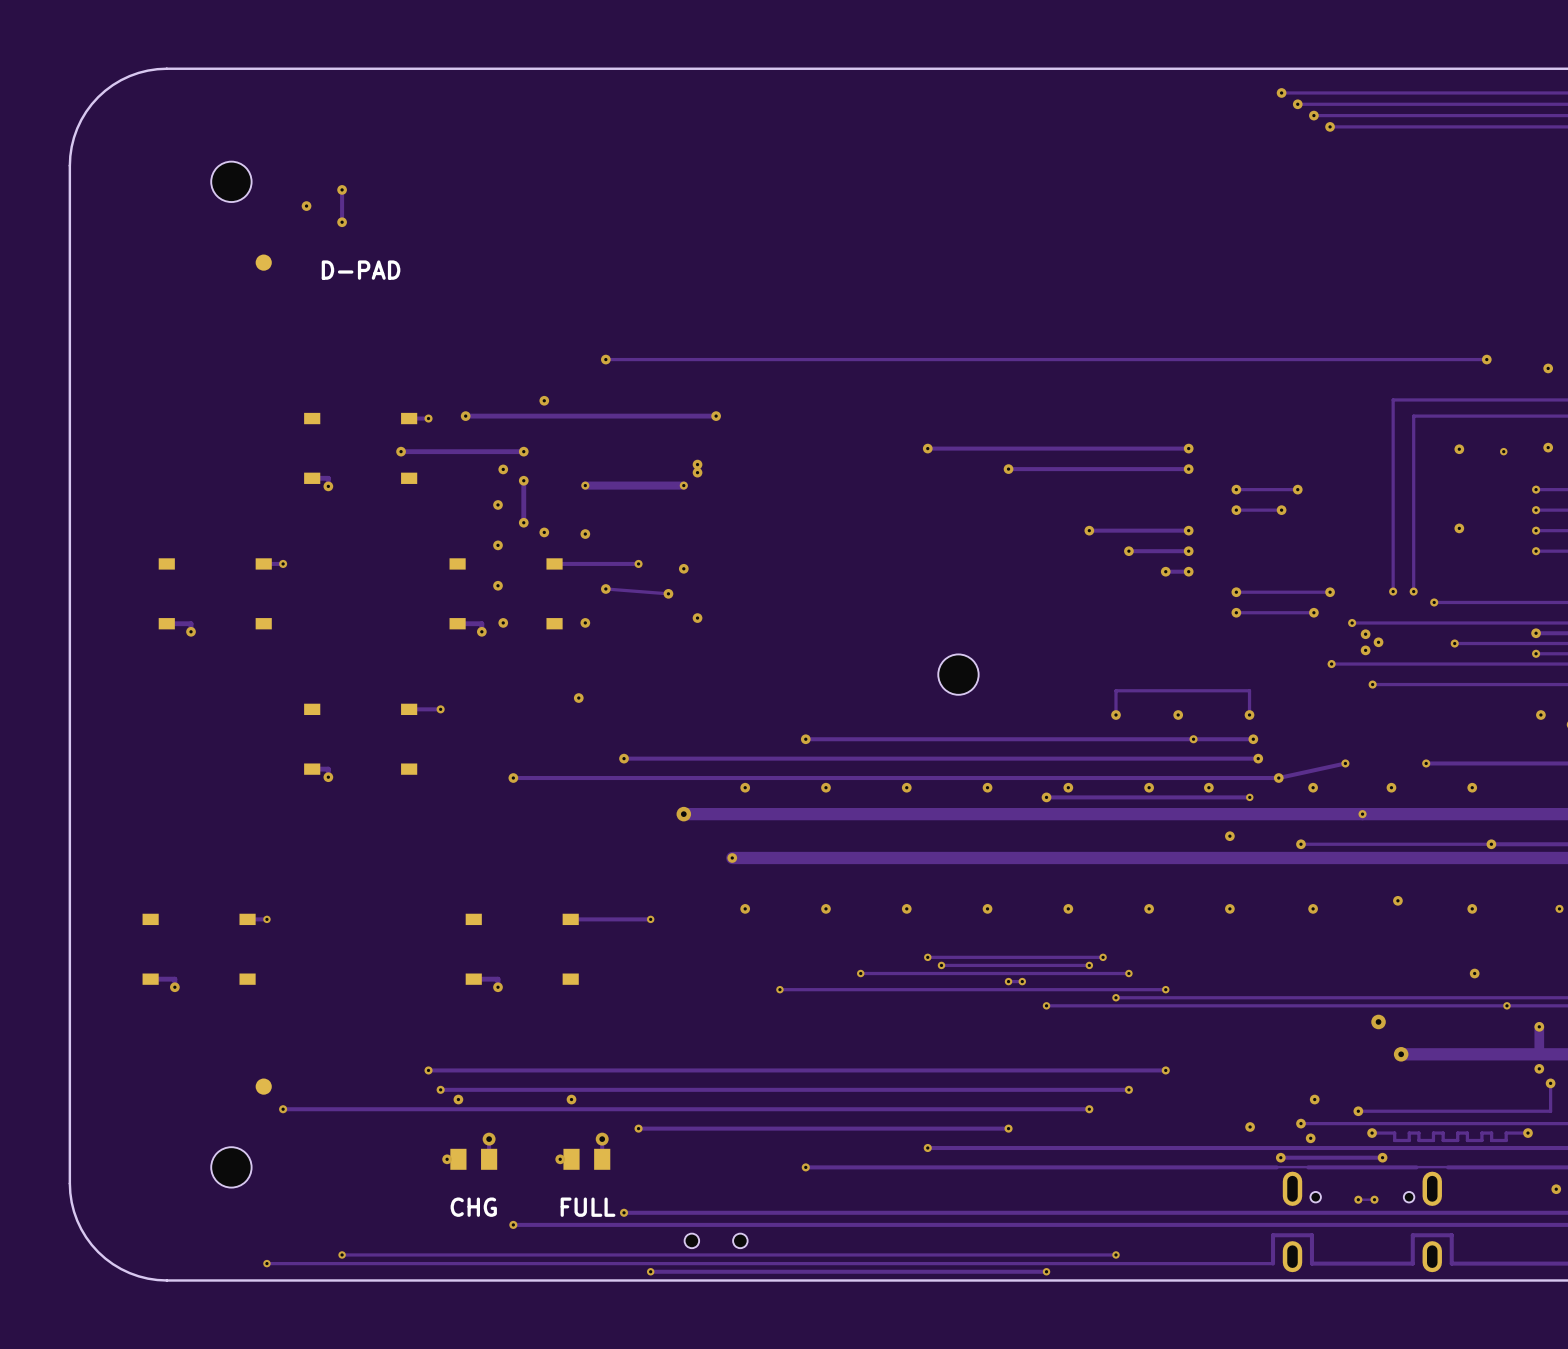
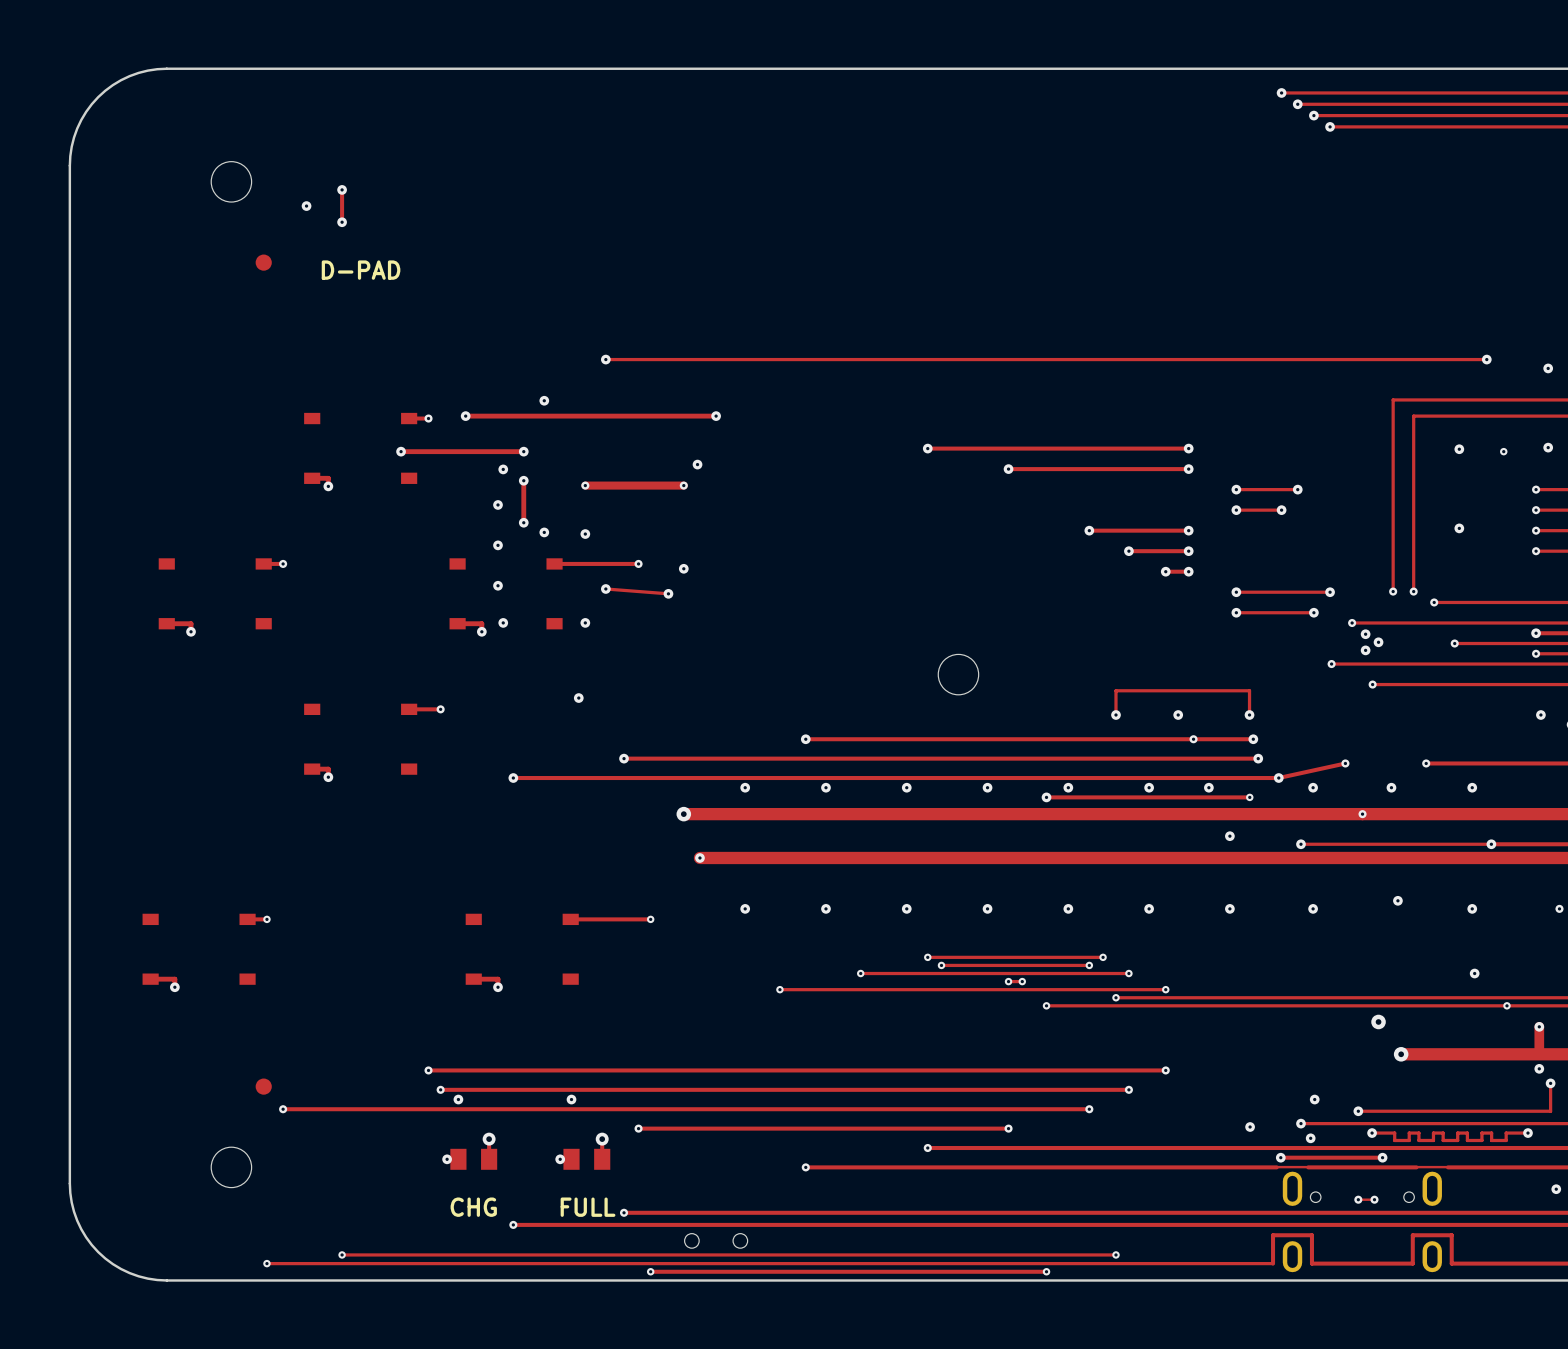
via: (697, 472) -> none
via: (697, 618) -> none
track: none -> (699, 857) (732, 857)
via position: (732, 857) -> (699, 857)

